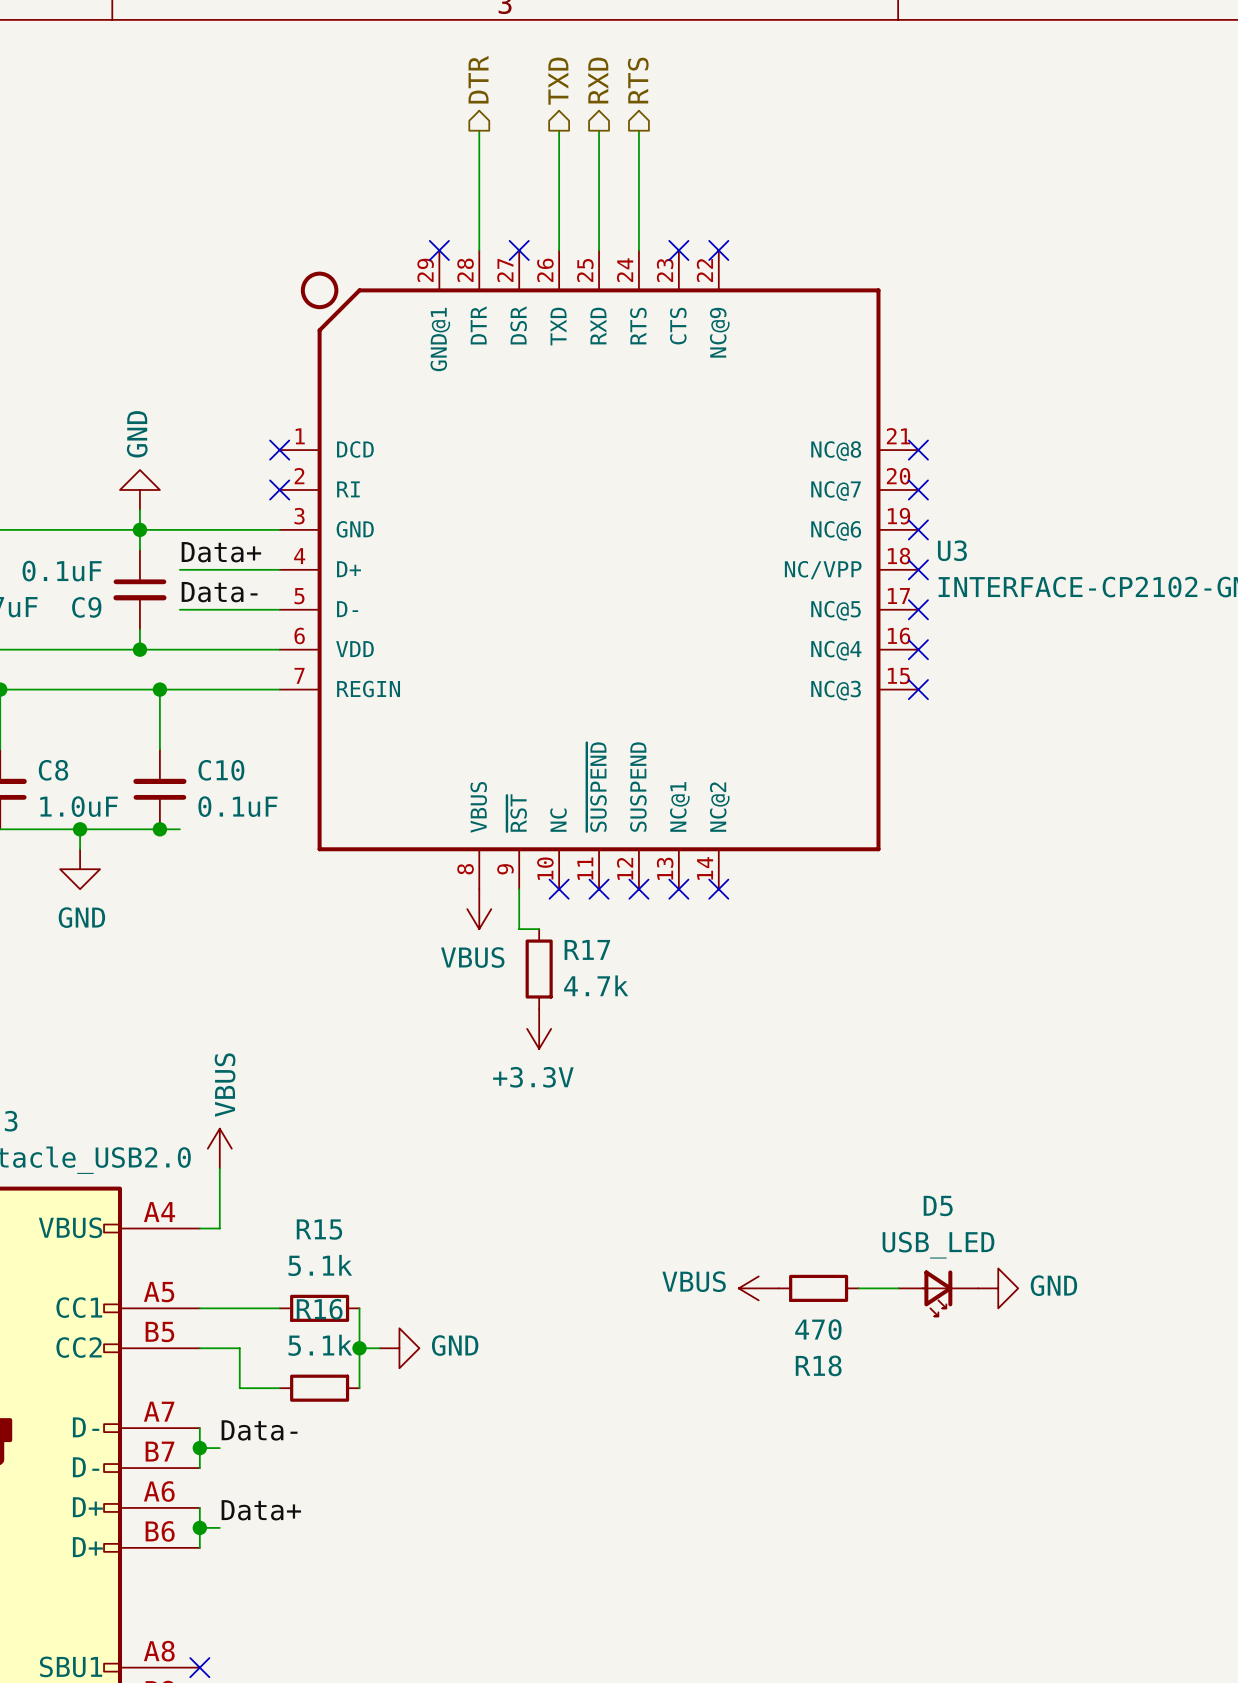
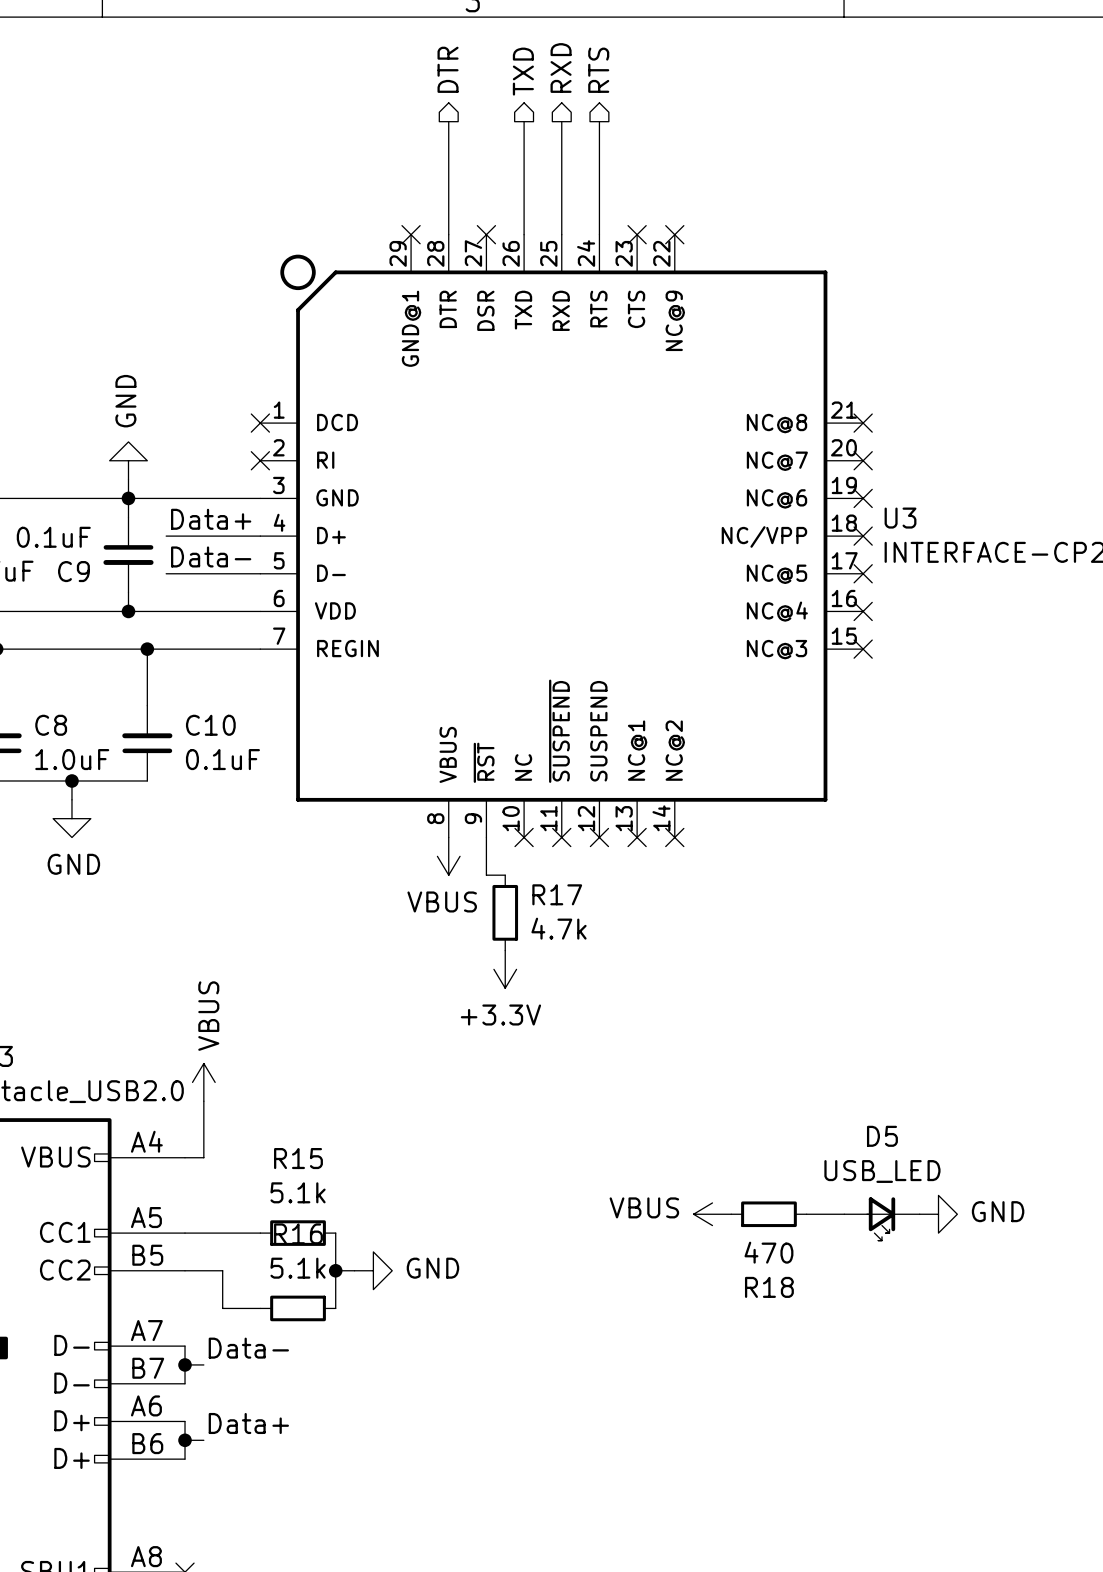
wire: (159, 829) (179, 829) -> none
junction: (159, 829) -> none

